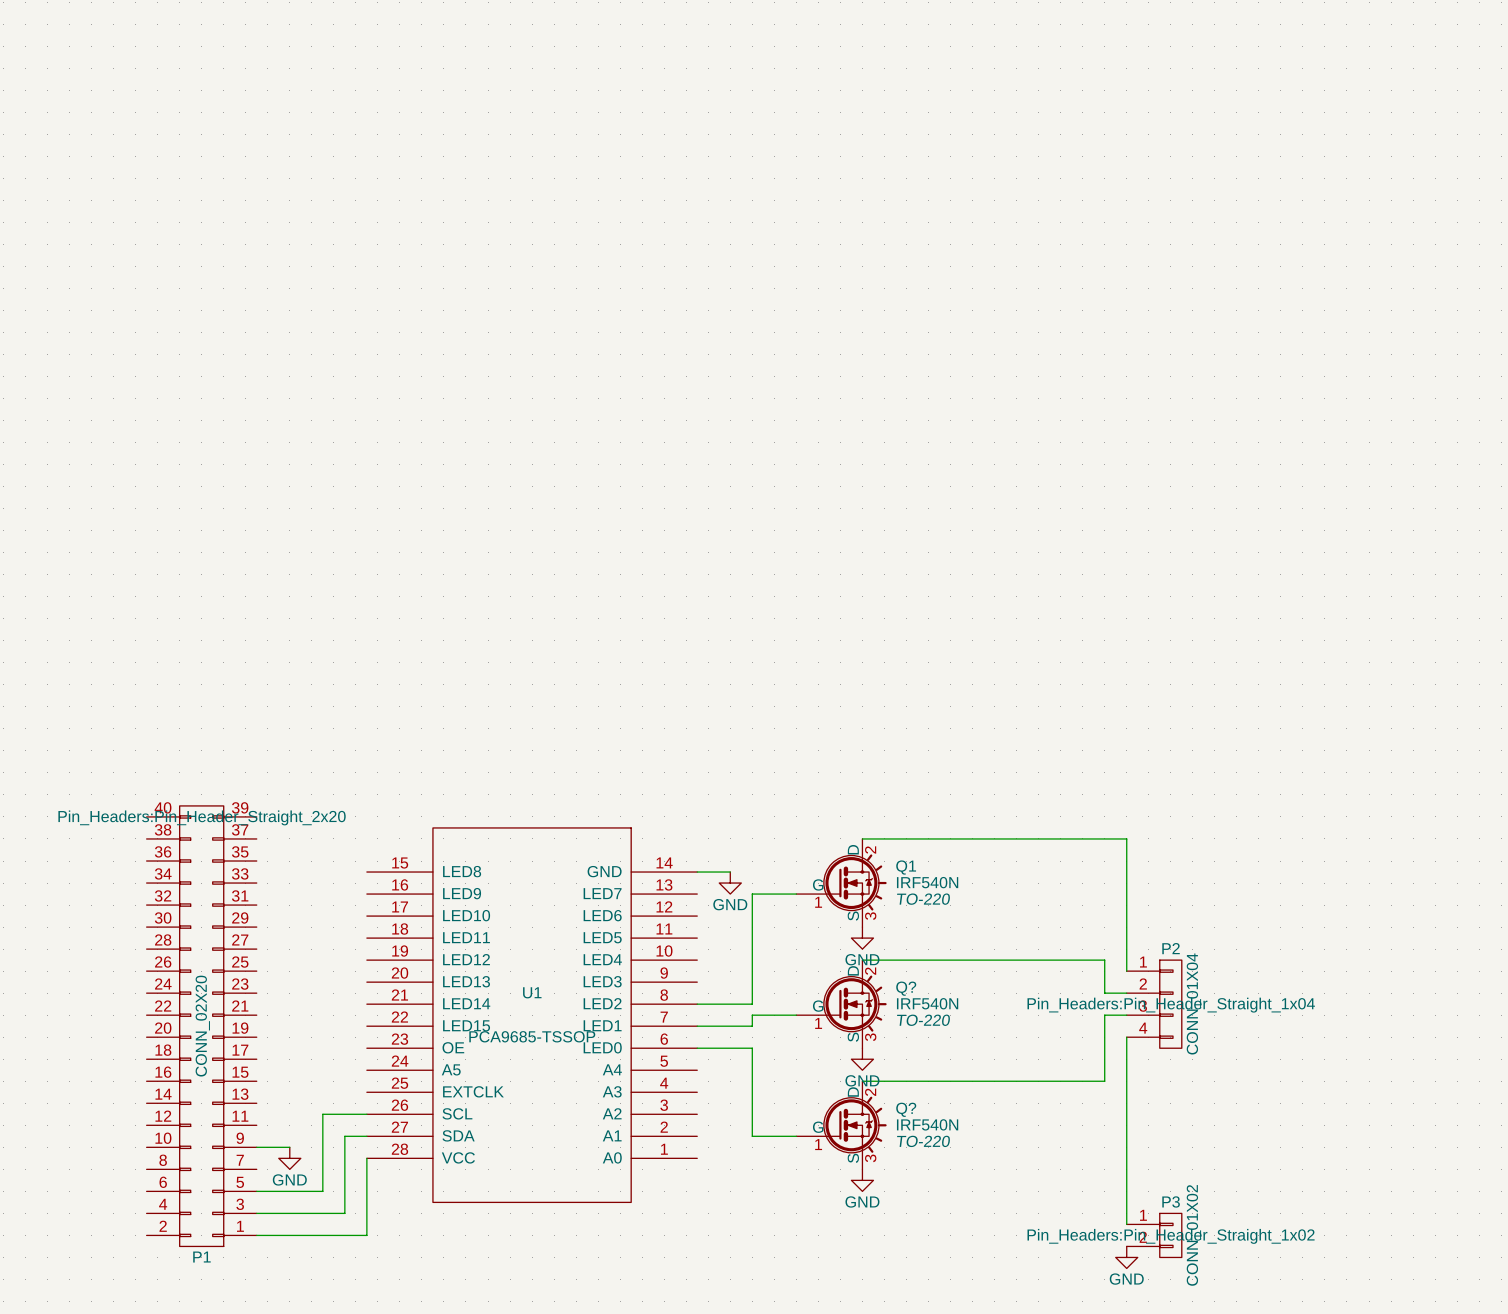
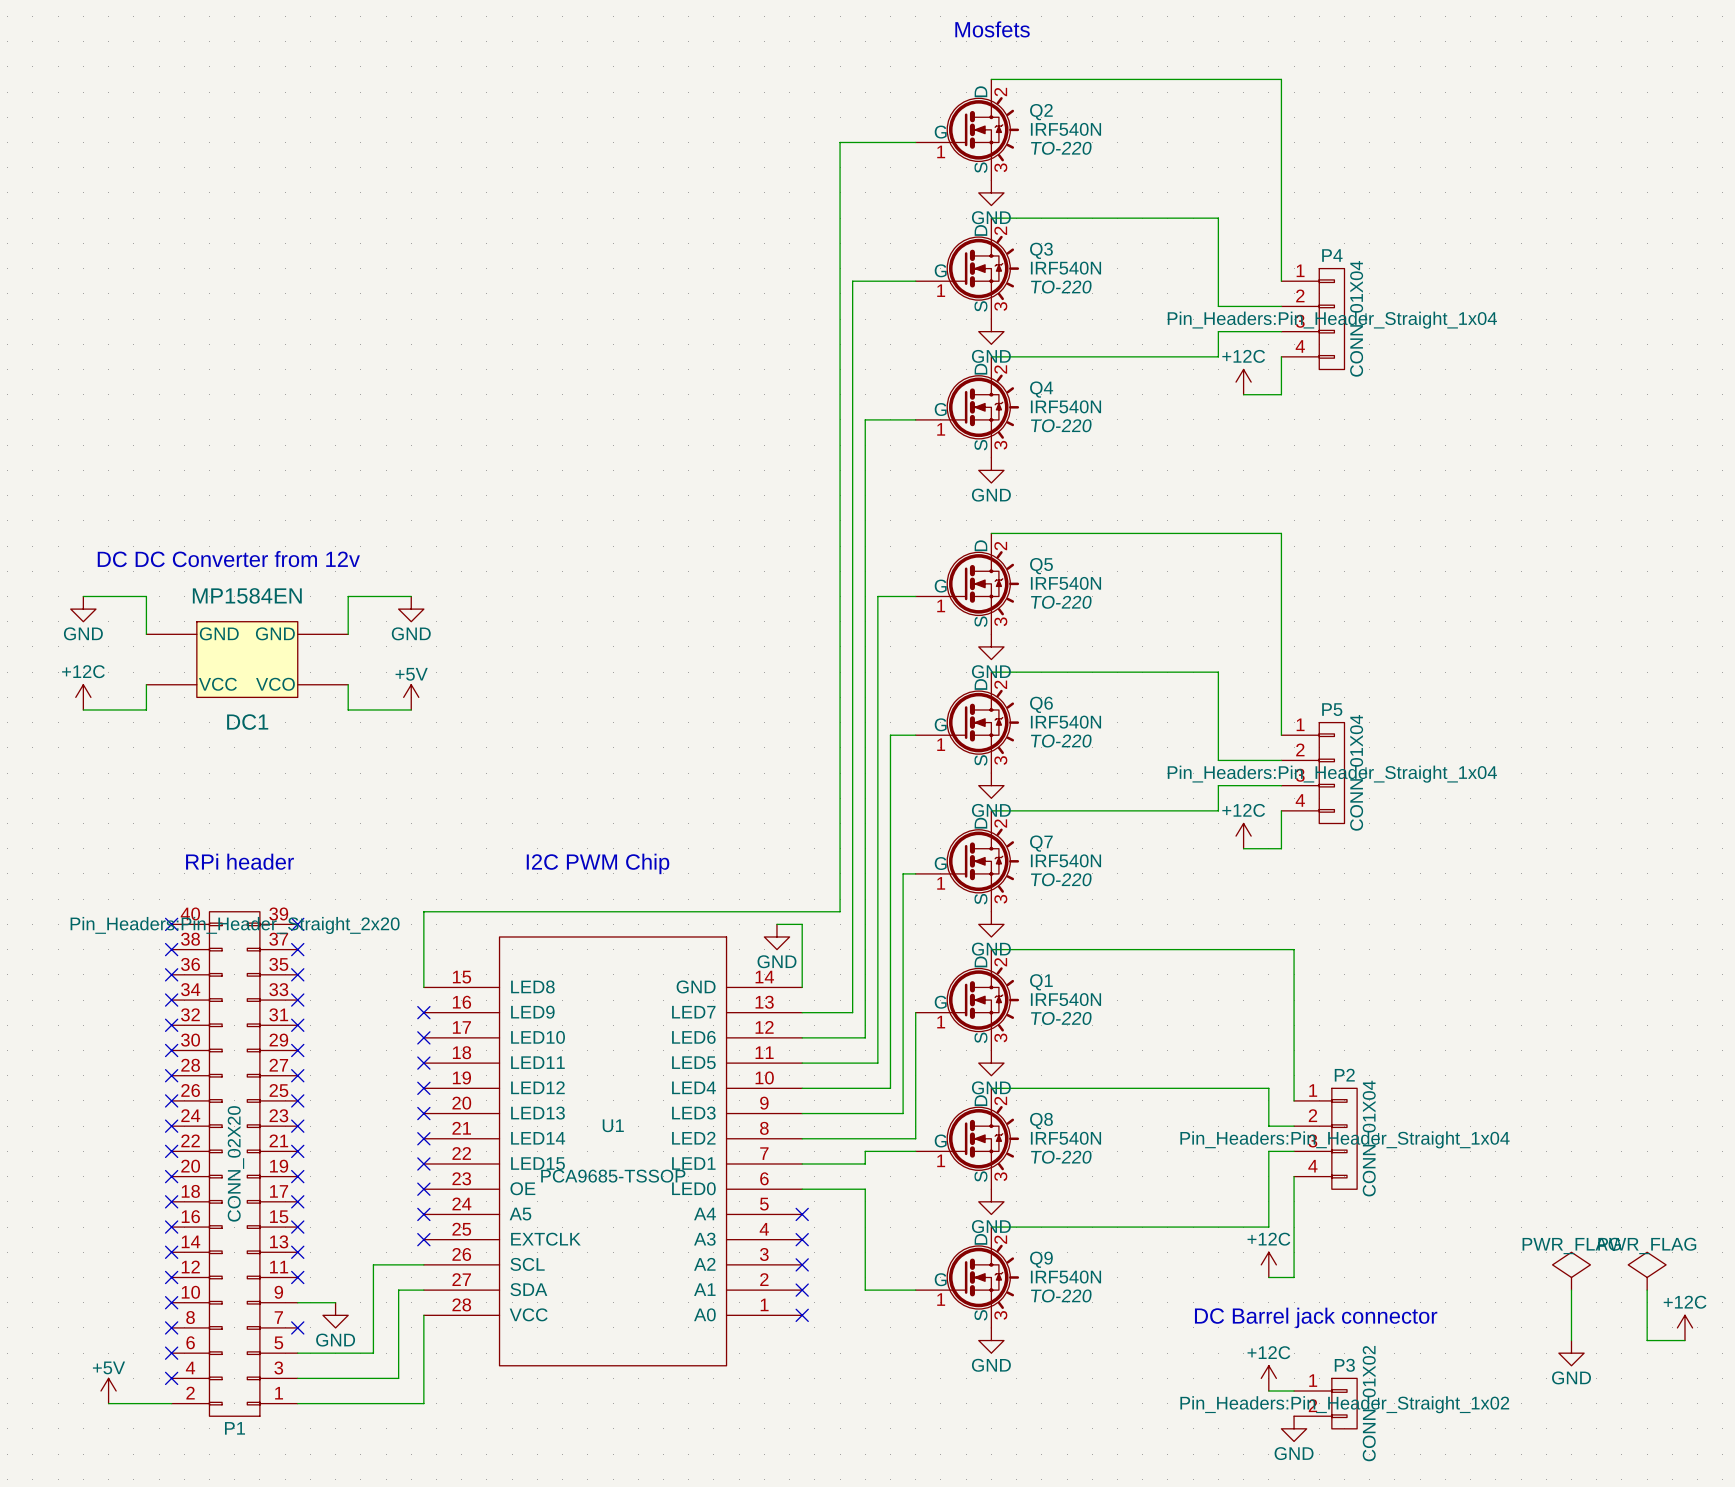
text: none -> Mosfets (992, 29)
wire: none -> (991, 79) (1281, 79) (1281, 281)
Q2: none -> IRF540N (967, 129)
wire: none -> (915, 142) (840, 142) (840, 911) (423, 911) (423, 987)
power symbol: none -> GND (991, 192)
wire: none -> (991, 218) (1218, 218) (1218, 306) (1281, 306)
Q3: none -> IRF540N (967, 268)
wire: none -> (915, 281) (852, 281) (852, 1012) (802, 1012)
P4: none -> CONN_01X04 (1312, 319)
power symbol: none -> GND (991, 331)
wire: none -> (1281, 331) (1218, 331) (1218, 356) (991, 356)
wire: none -> (1281, 356) (1281, 394) (1243, 394)
power symbol: none -> +12C (1243, 382)
Q4: none -> IRF540N (967, 407)
power symbol: none -> GND (991, 470)
wire: none -> (991, 533) (1281, 533) (1281, 735)
text: none -> DC DC Converter from 12v (228, 559)
Q5: none -> IRF540N (967, 583)
wire: none -> (83, 596) (146, 596) (146, 634)
wire: none -> (411, 596) (348, 596) (348, 634)
wire: none -> (915, 596) (877, 596) (877, 1063) (802, 1063)
power symbol: none -> GND (83, 609)
power symbol: none -> GND (411, 609)
power symbol: none -> GND (991, 646)
DC1: none -> MP1584EN (247, 659)
wire: none -> (991, 672) (1218, 672) (1218, 760) (1281, 760)
wire: none -> (146, 684) (146, 709) (83, 709)
wire: none -> (348, 684) (348, 709) (411, 709)
power symbol: none -> +12C (83, 697)
power symbol: none -> +5V (411, 697)
Q6: none -> IRF540N (967, 722)
wire: none -> (915, 735) (890, 735) (890, 1088) (802, 1088)
P5: none -> CONN_01X04 (1312, 773)
power symbol: none -> GND (991, 785)
wire: none -> (1281, 785) (1218, 785) (1218, 810) (991, 810)
wire: none -> (1281, 810) (1281, 848) (1243, 848)
power symbol: none -> +12C (1243, 836)
Q7: none -> IRF540N (967, 861)
text: none -> RPi header (239, 861)
text: none -> I2C PWM Chip (598, 863)
wire: none -> (915, 873) (903, 873) (903, 1113) (802, 1113)
no-connect mark: none -> (171, 924)
no-connect mark: none -> (297, 924)
power symbol: none -> GND (991, 924)
power symbol: none -> GND (776, 936)
no-connect mark: none -> (171, 949)
no-connect mark: none -> (297, 949)
no-connect mark: none -> (171, 974)
no-connect mark: none -> (297, 974)
wire: (697, 872) (730, 872) -> (802, 987) (802, 924) (776, 924)
no-connect mark: none -> (171, 1000)
no-connect mark: none -> (297, 1000)
power symbol: GND (730, 883) -> none
no-connect mark: none -> (423, 1012)
wire: (752, 894) (796, 894) -> (865, 1012) (865, 419) (915, 419)
no-connect mark: none -> (171, 1025)
no-connect mark: none -> (297, 1025)
no-connect mark: none -> (423, 1037)
wire: none -> (802, 1037) (865, 1037)
wire: (752, 916) (752, 1004) -> (915, 1012) (915, 1138) (865, 1138)
no-connect mark: none -> (171, 1050)
no-connect mark: none -> (297, 1050)
no-connect mark: none -> (423, 1063)
no-connect mark: none -> (171, 1075)
no-connect mark: none -> (297, 1075)
no-connect mark: none -> (423, 1088)
no-connect mark: none -> (171, 1100)
no-connect mark: none -> (297, 1100)
no-connect mark: none -> (423, 1113)
Q? name: Q? (906, 988) -> Q8 (1041, 1121)
no-connect mark: none -> (171, 1126)
no-connect mark: none -> (297, 1126)
no-connect mark: none -> (423, 1138)
no-connect mark: none -> (171, 1151)
no-connect mark: none -> (297, 1151)
no-connect mark: none -> (423, 1163)
no-connect mark: none -> (171, 1176)
no-connect mark: none -> (297, 1176)
no-connect mark: none -> (423, 1189)
no-connect mark: none -> (171, 1201)
no-connect mark: none -> (297, 1201)
no-connect mark: none -> (423, 1214)
no-connect mark: none -> (802, 1214)
no-connect mark: none -> (171, 1227)
no-connect mark: none -> (297, 1227)
no-connect mark: none -> (423, 1239)
no-connect mark: none -> (802, 1239)
no-connect mark: none -> (171, 1252)
no-connect mark: none -> (297, 1252)
Q? name: Q? (906, 1109) -> Q9 (1041, 1259)
no-connect mark: none -> (802, 1264)
power symbol: none -> +12C (1268, 1264)
power symbol: none -> PWR_FLAG (1571, 1271)
power symbol: none -> PWR_FLAG (1647, 1271)
no-connect mark: none -> (171, 1277)
no-connect mark: none -> (297, 1277)
wire: (1126, 1125) (1126, 1224) -> (1294, 1277) (1268, 1277)
no-connect mark: none -> (802, 1290)
wire: none -> (1571, 1290) (1571, 1340)
wire: none -> (1647, 1290) (1647, 1340) (1684, 1340)
no-connect mark: none -> (171, 1302)
no-connect mark: none -> (802, 1315)
text: none -> DC Barrel jack connector (1316, 1317)
no-connect mark: none -> (171, 1327)
no-connect mark: none -> (297, 1327)
power symbol: none -> +12C (1684, 1327)
no-connect mark: none -> (171, 1353)
power symbol: none -> GND (1571, 1353)
no-connect mark: none -> (171, 1378)
power symbol: none -> +12C (1268, 1378)
power symbol: none -> +5V (108, 1391)
wire: none -> (1268, 1391) (1294, 1391)
wire: none -> (108, 1403) (171, 1403)

